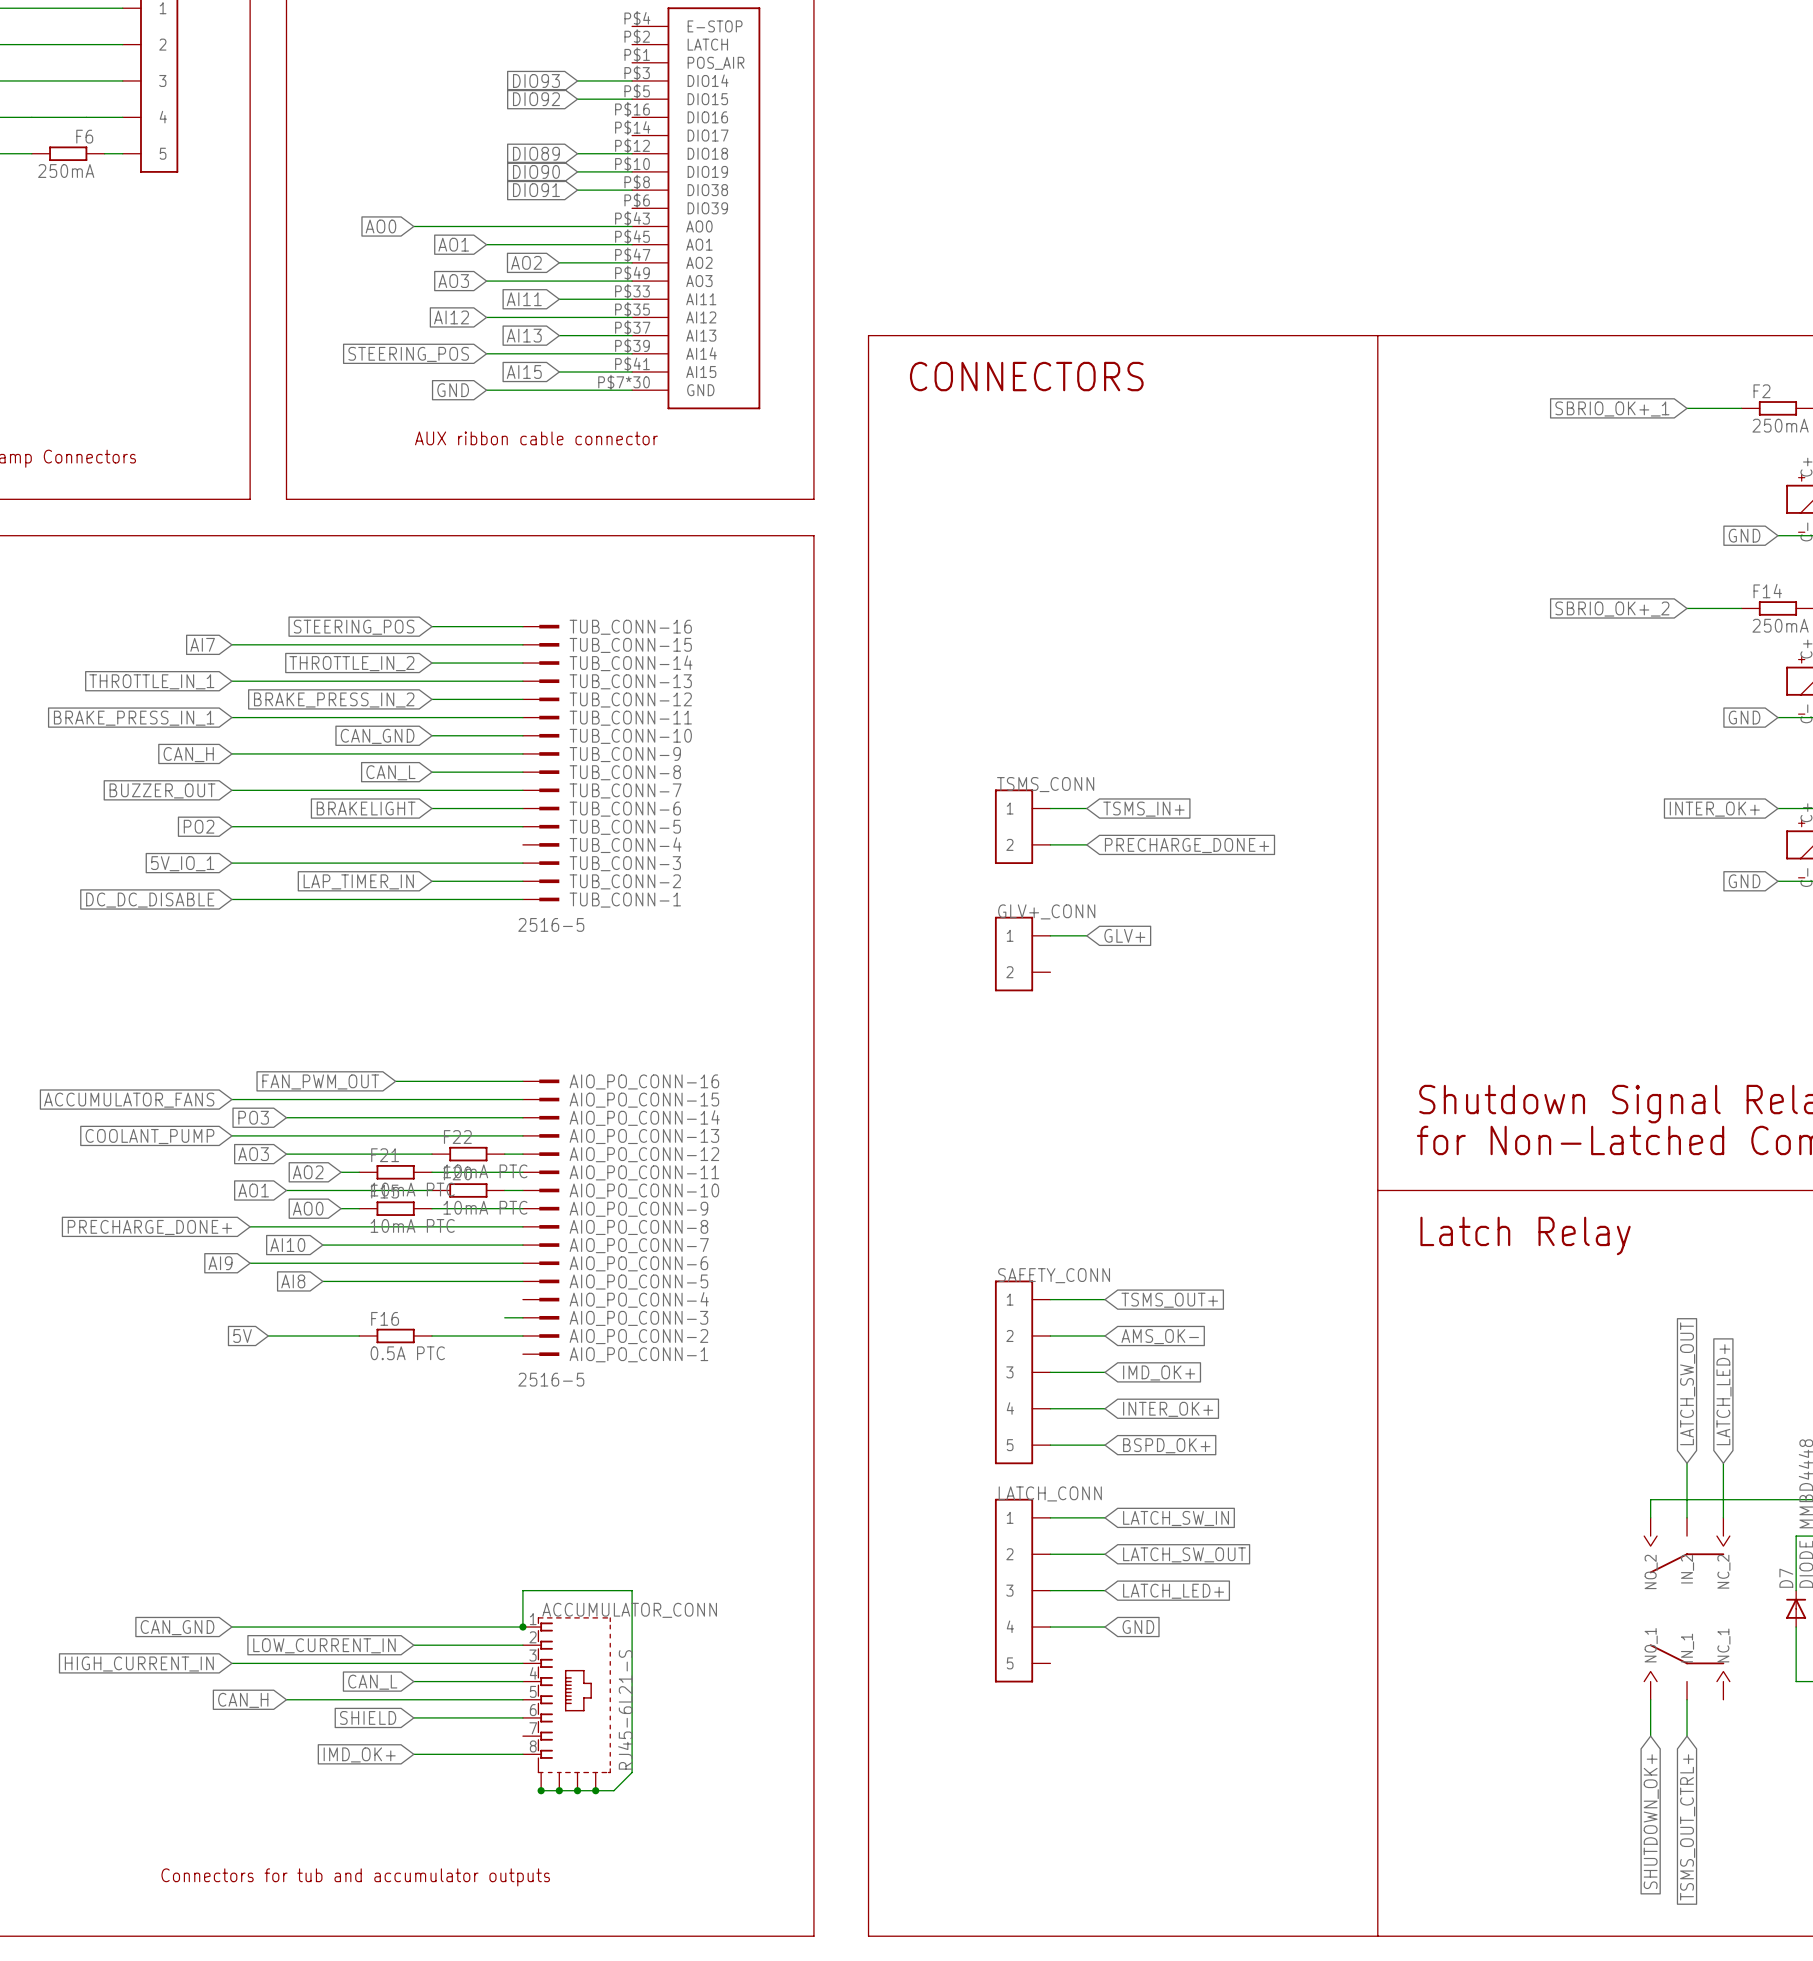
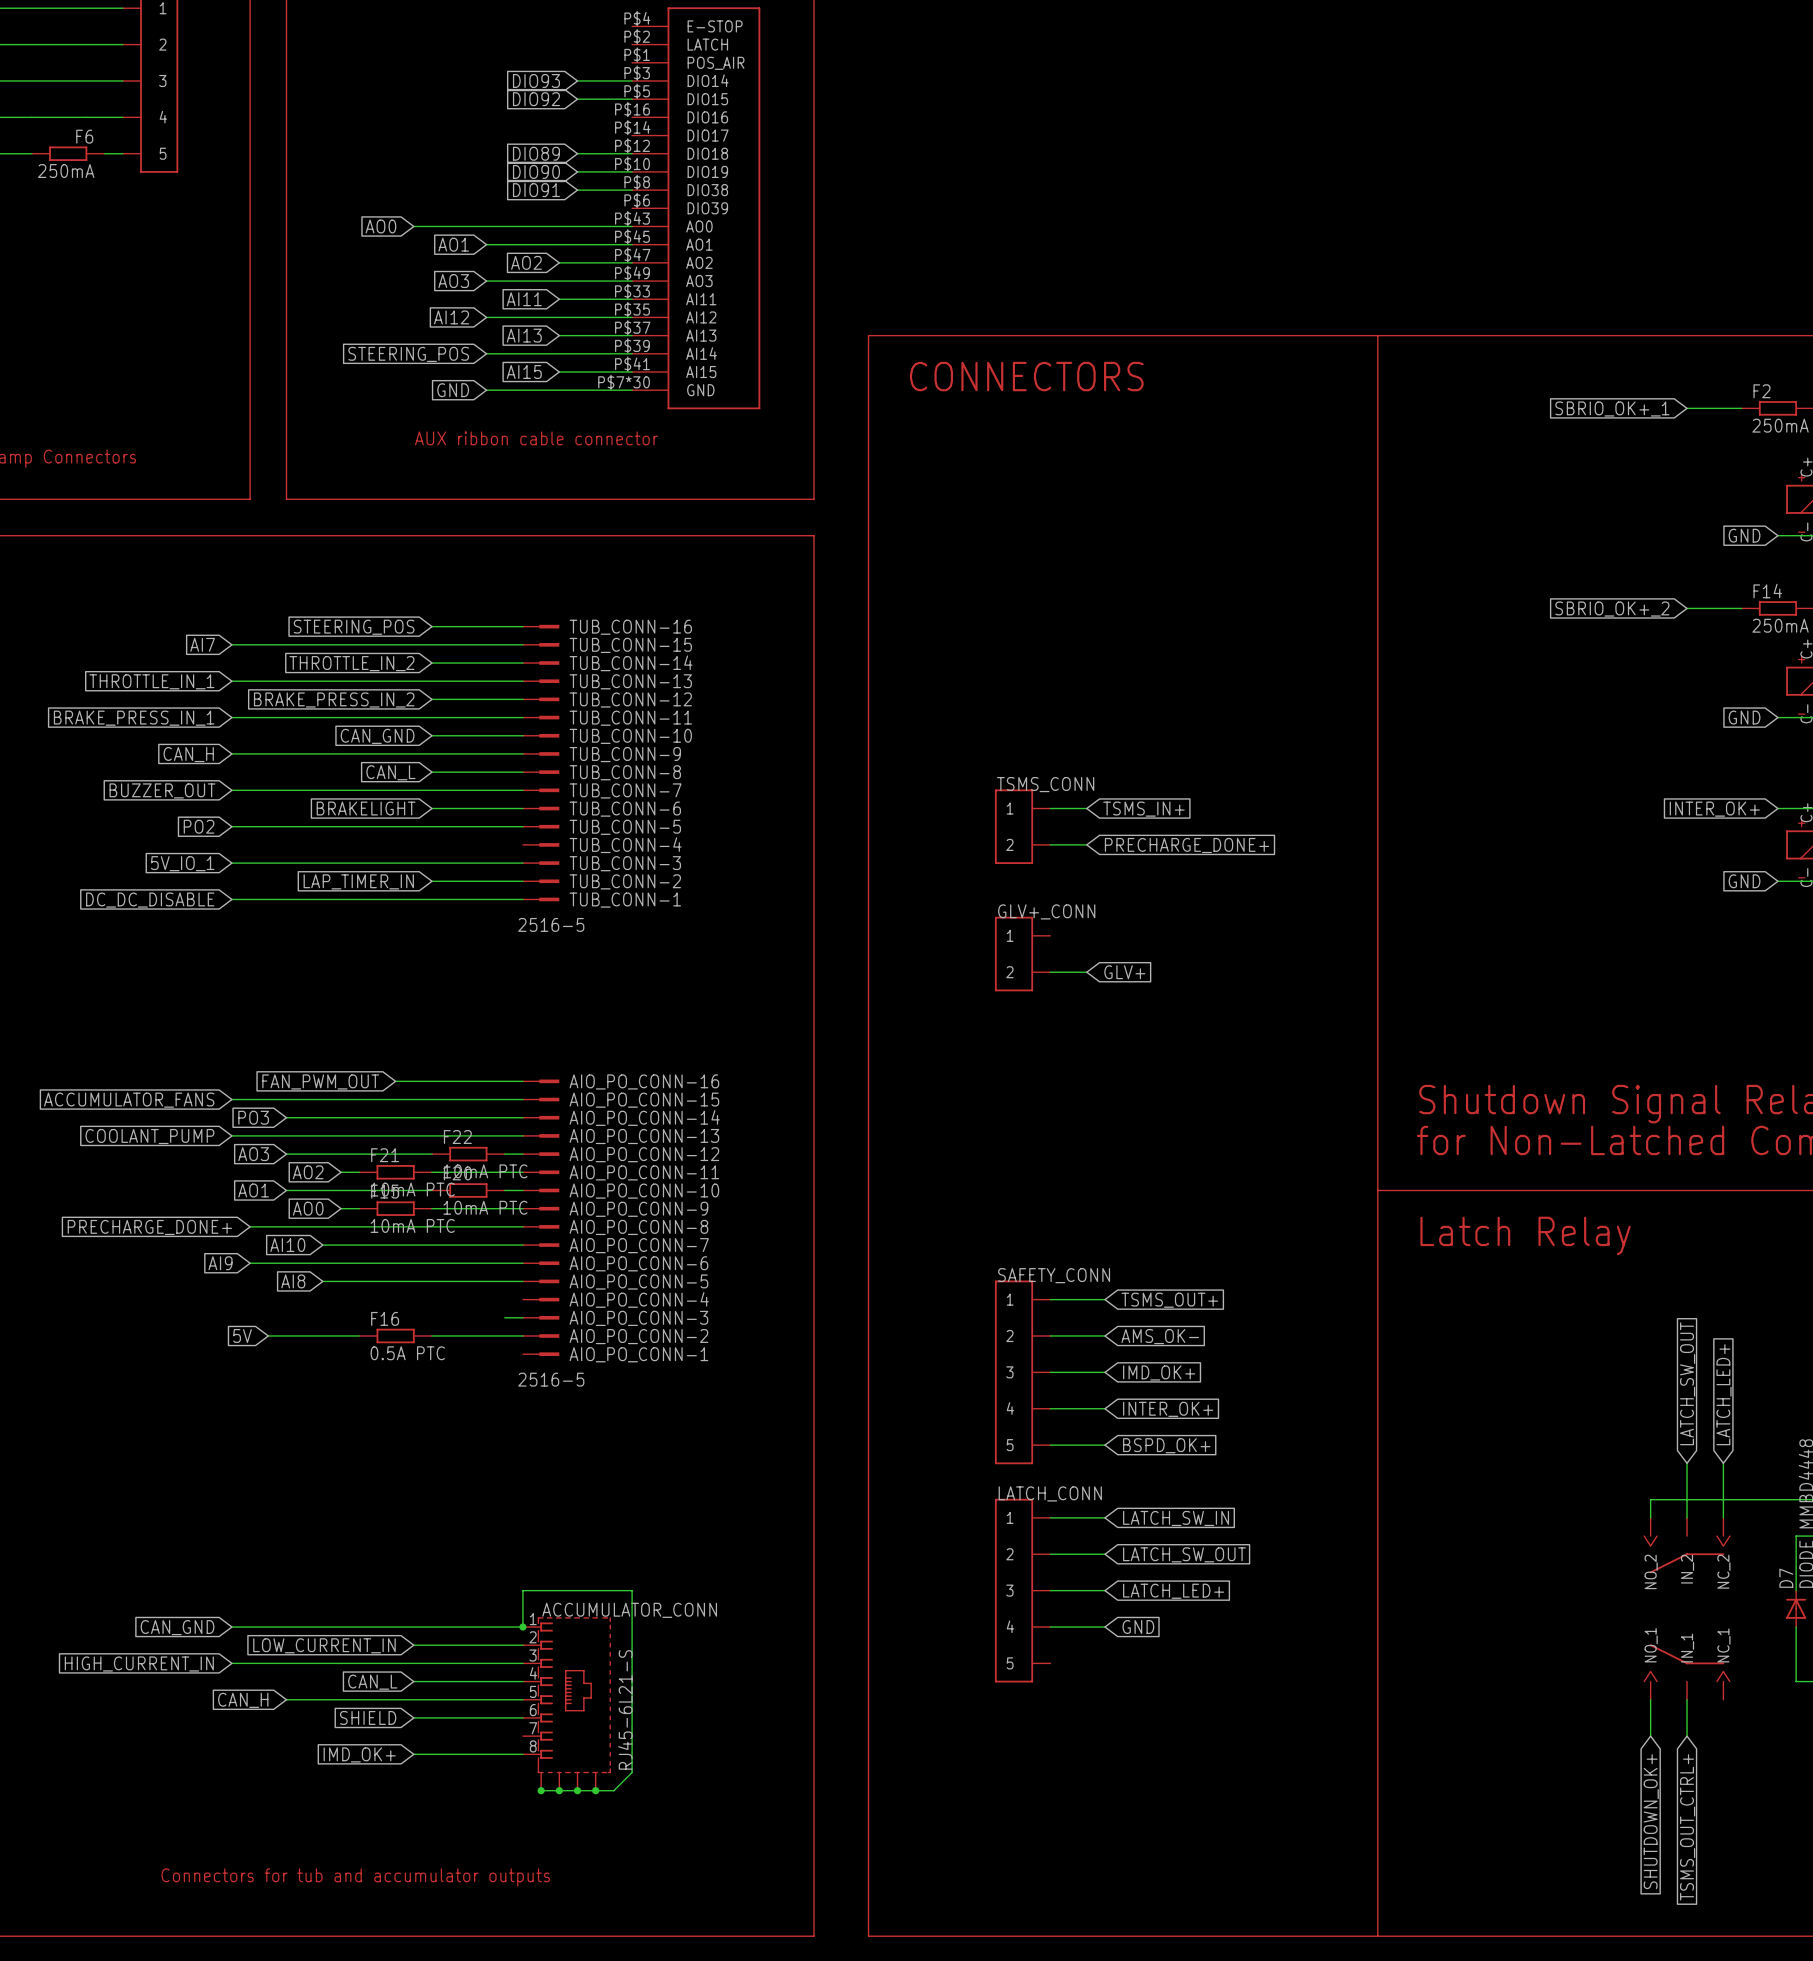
wire: (1050, 935) (1086, 935) -> (1050, 972) (1086, 972)
global label position: GLV+ (1124, 935) -> GLV+ (1124, 972)

